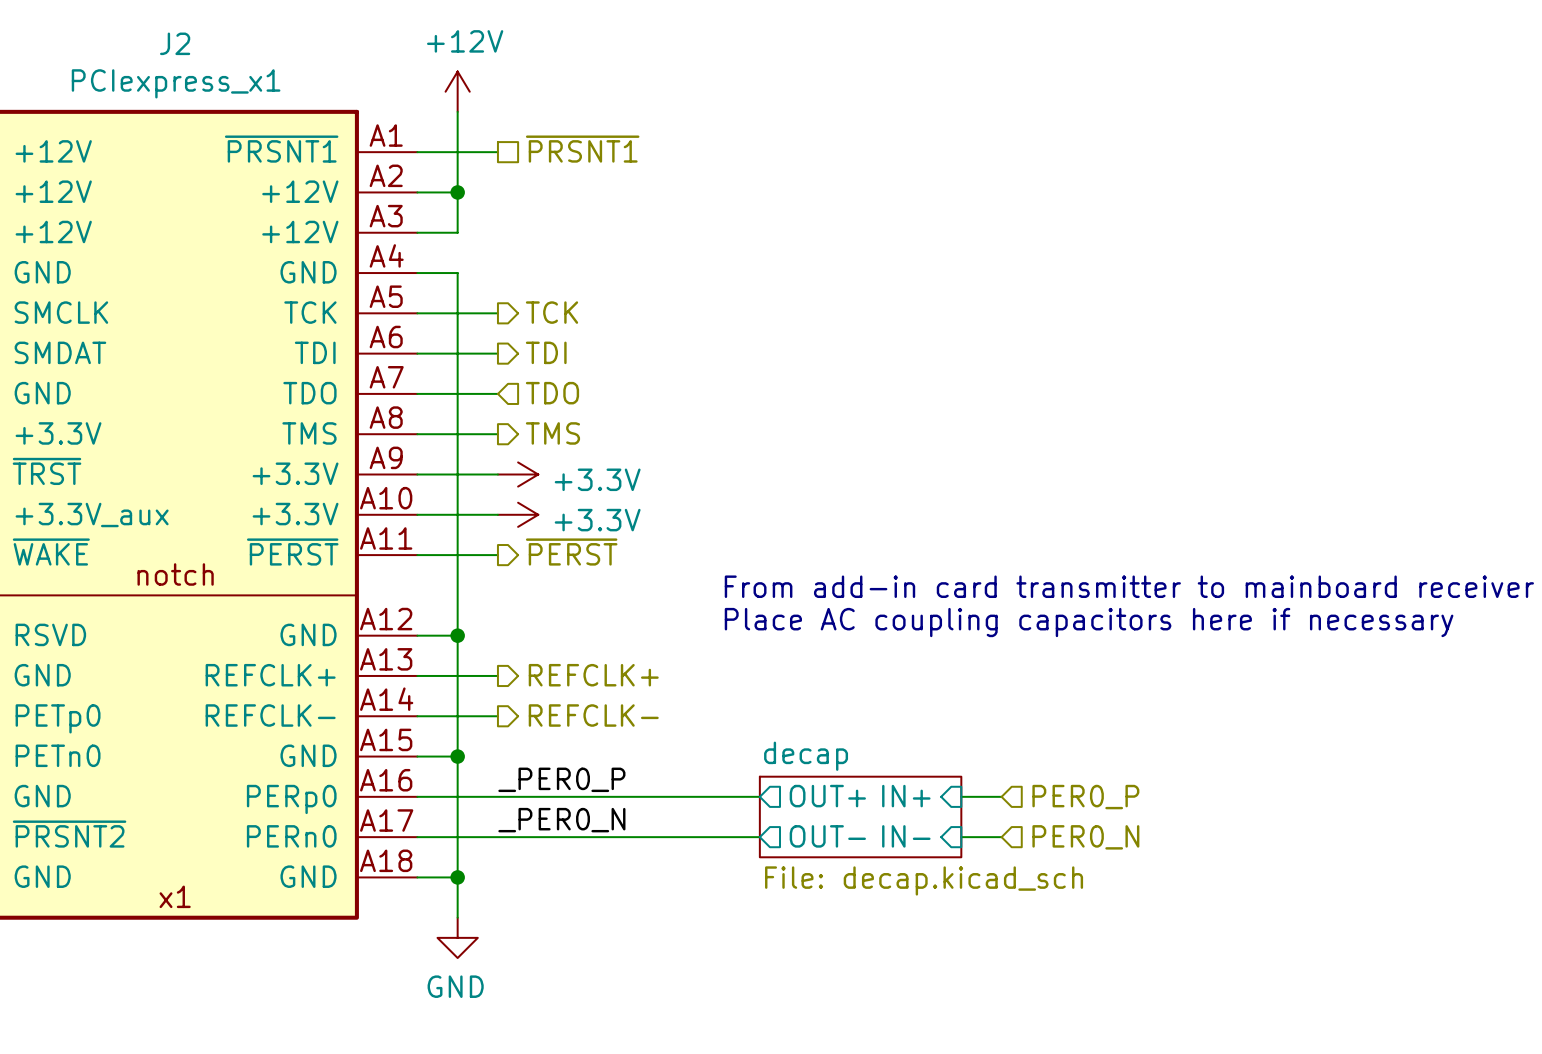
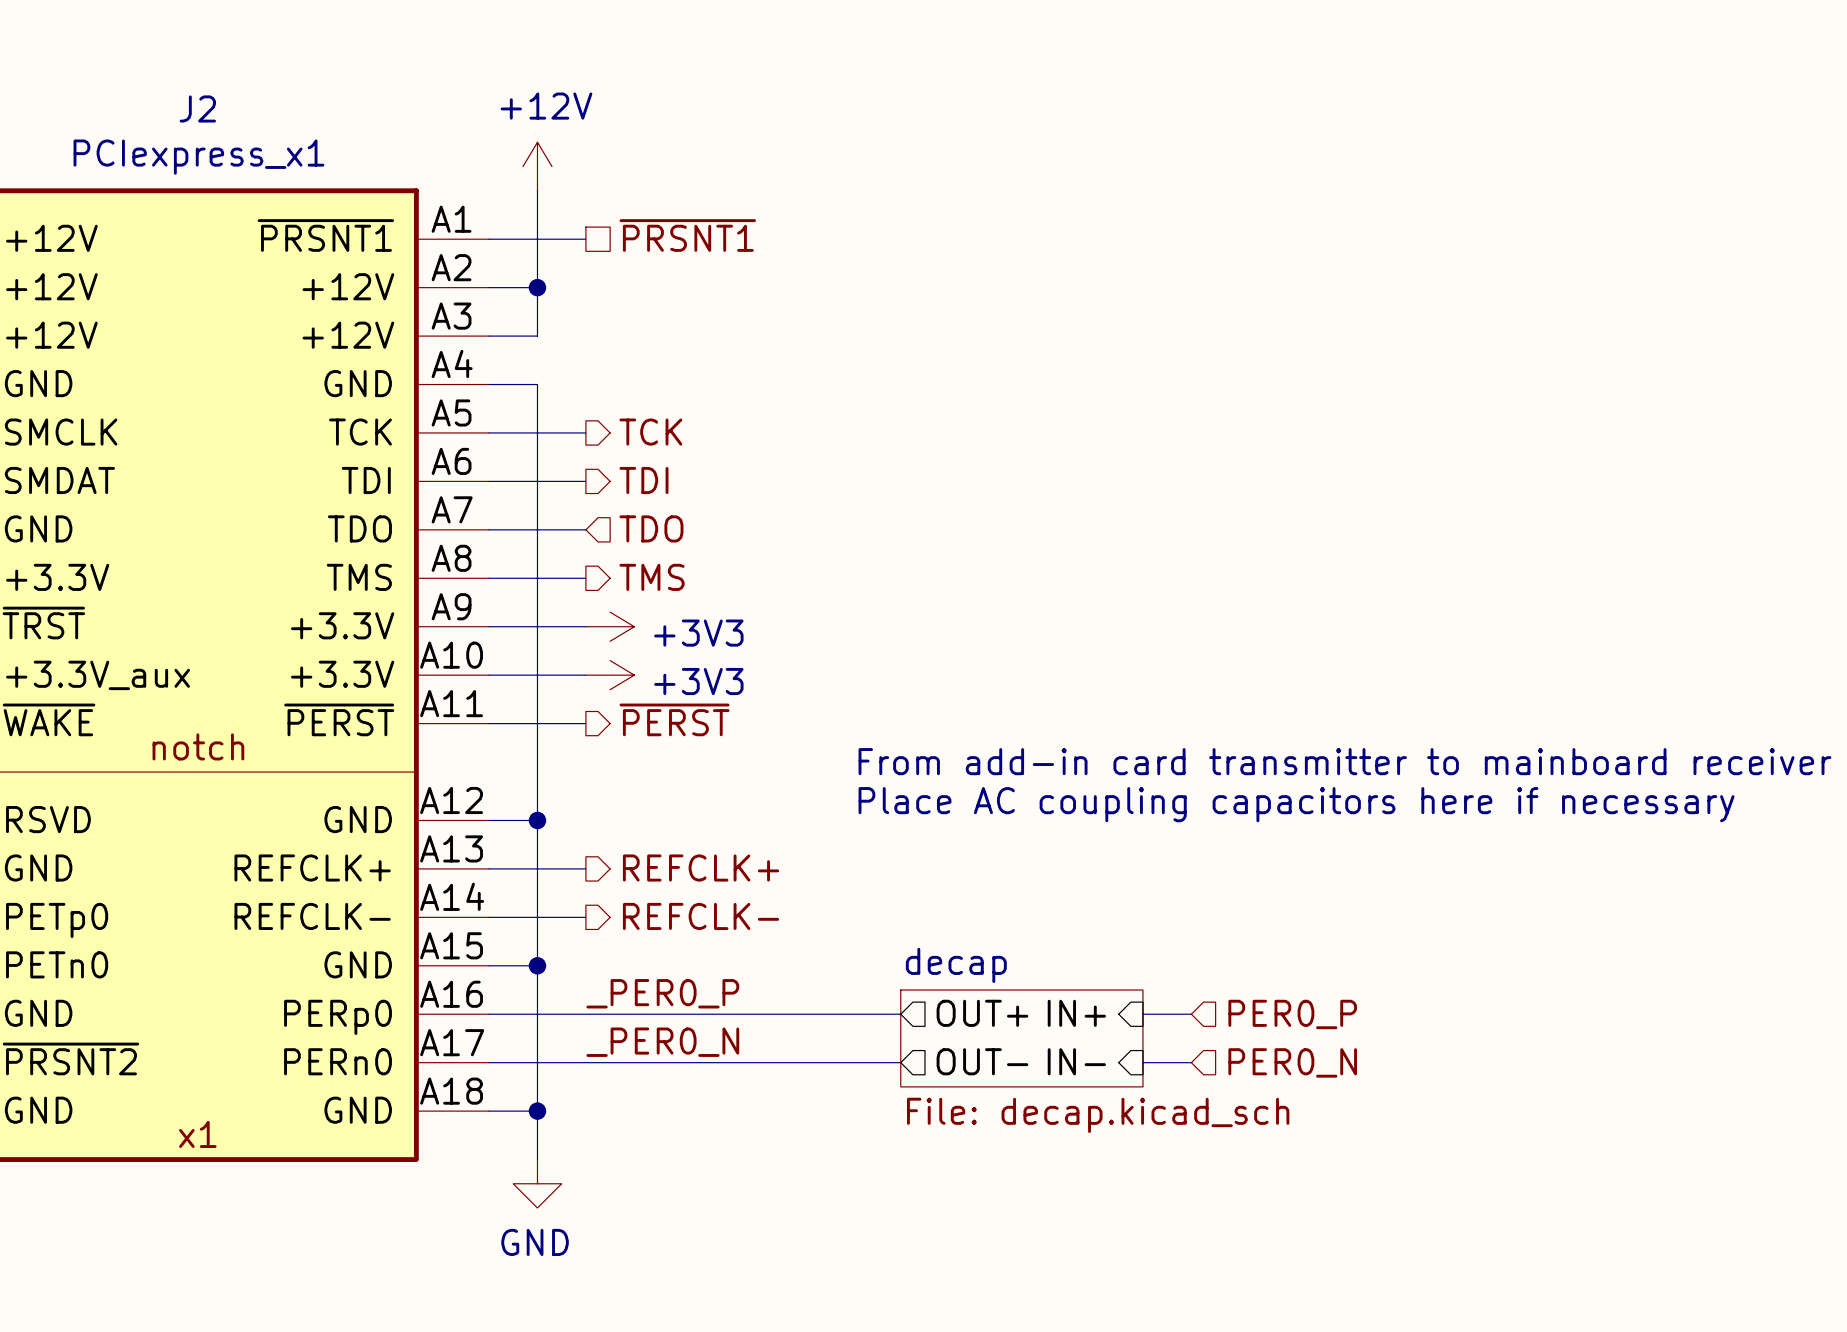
power symbol: +3.3V (518, 474) -> +3V3 (610, 626)
power symbol: +3.3V (518, 514) -> +3V3 (610, 675)

